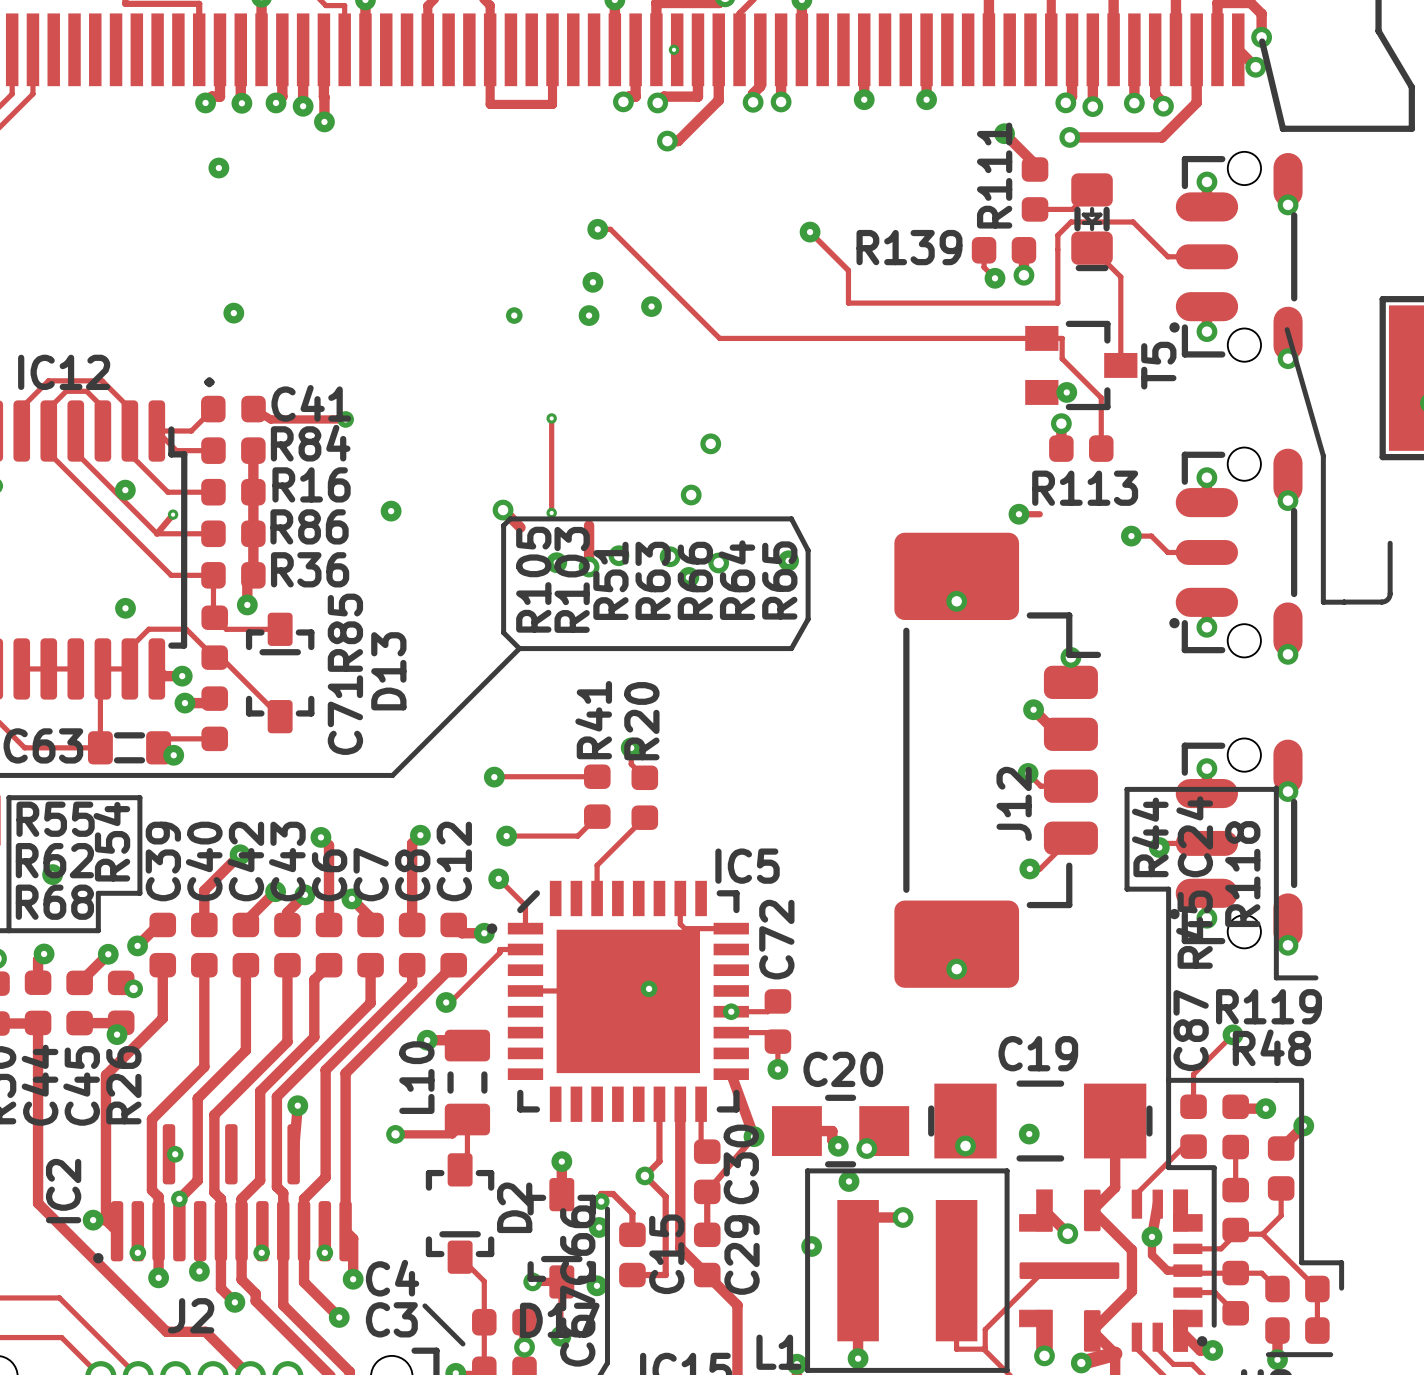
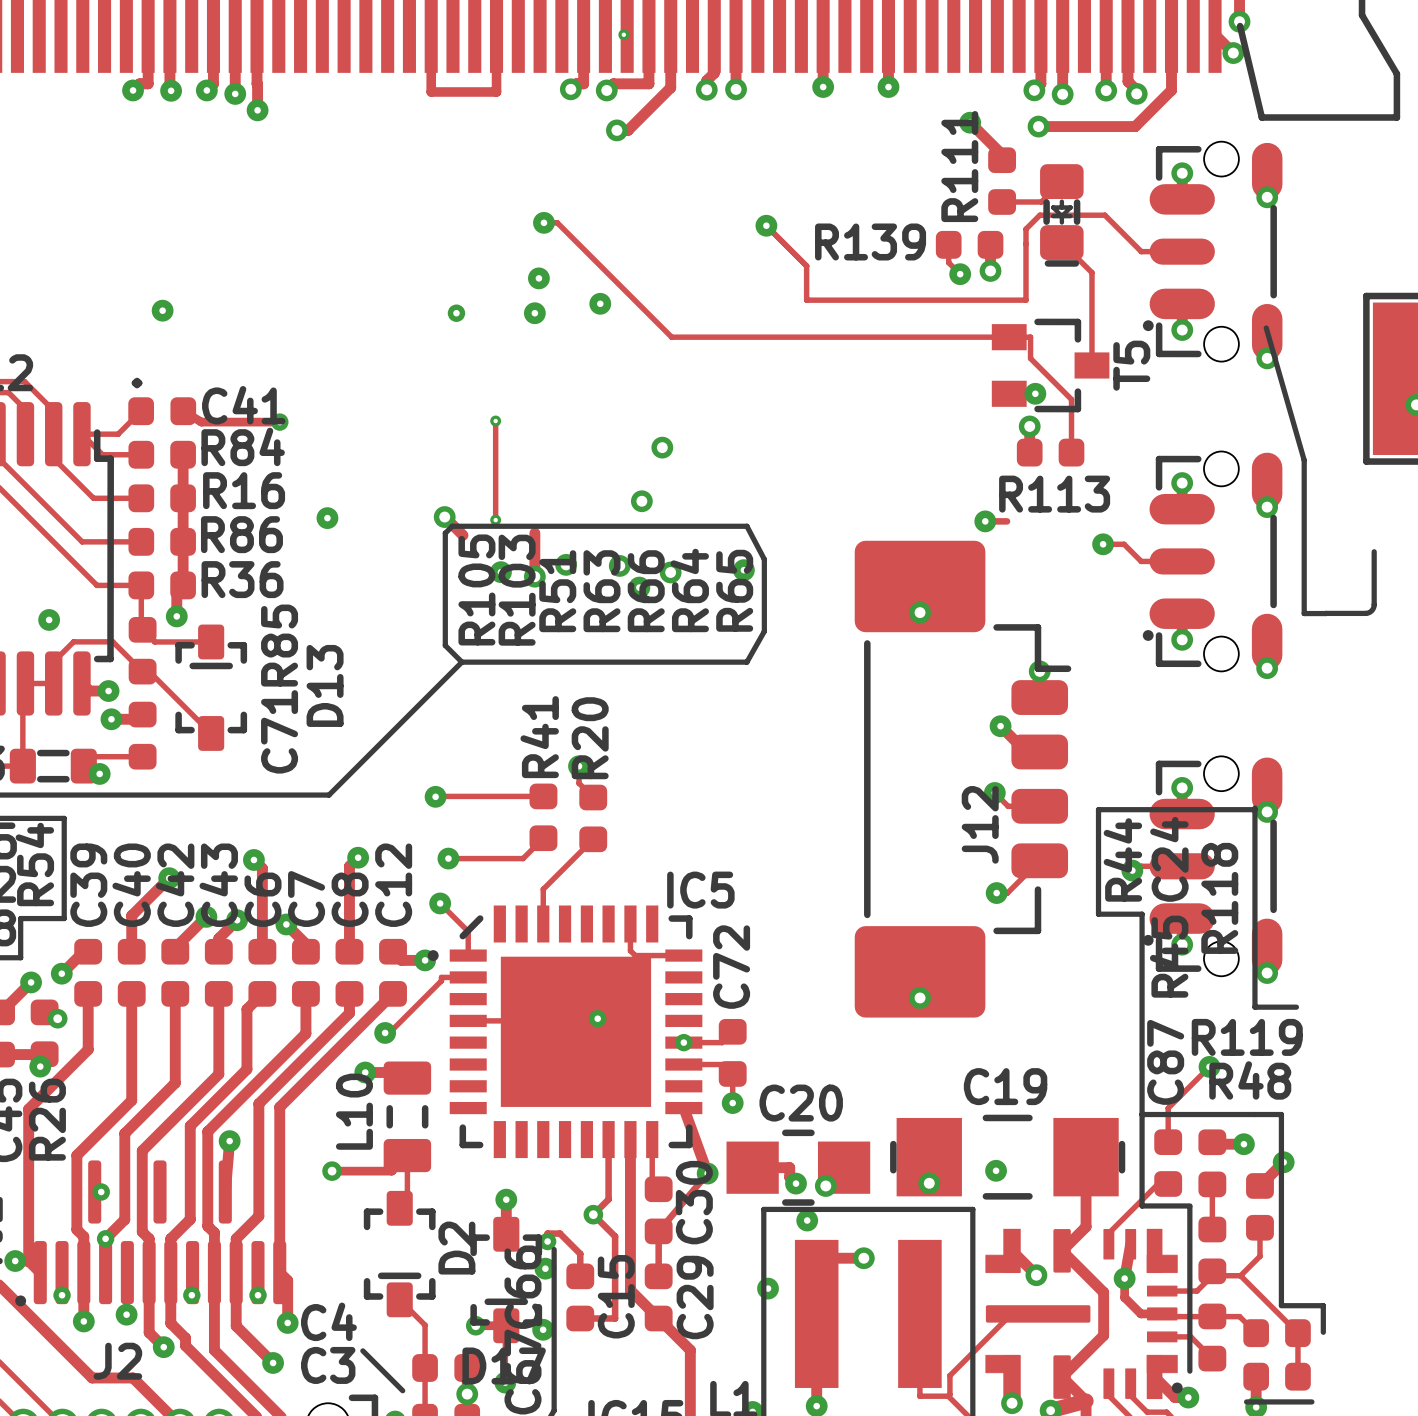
via: (218, 168) -> none
via: (125, 490) -> none
track: (173, 514) (157, 533) -> none
via: (173, 514) -> none

